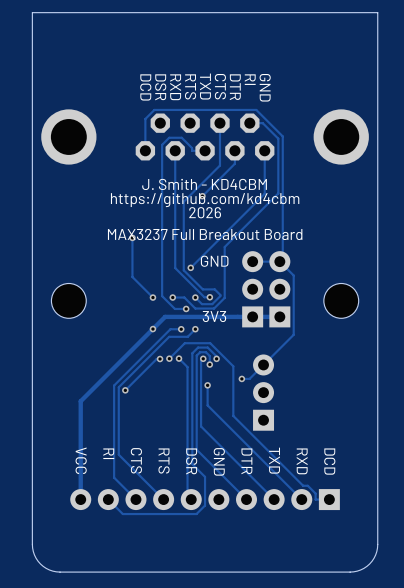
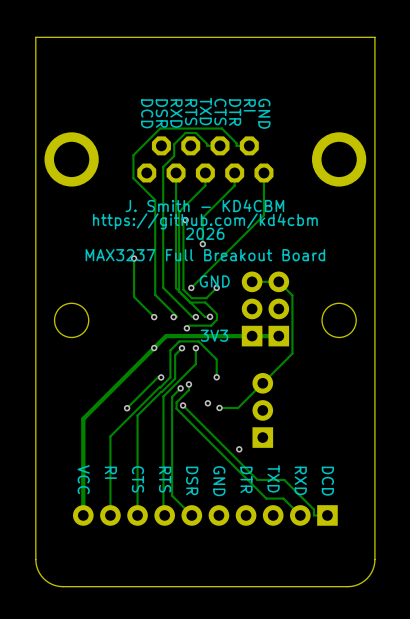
track: (219, 123) (219, 165) (183, 201) (183, 270) (202, 289) (214, 289) (220, 294) (212, 304) (202, 304) (195, 297) -> none
track: (249, 123) (262, 123) (278, 138) (278, 193) (224, 247) (224, 297) (214, 308) (195, 308) (184, 297) (172, 297) -> (249, 145) (236, 145) (236, 143) (221, 128) (160, 128) (133, 155) (133, 178) (155, 200) (155, 294) (177, 316)
track: (162, 144) (169, 137) (181, 137) (192, 148) (192, 150) (205, 150) -> (163, 167) (174, 156) (174, 144) (185, 132) (195, 132) (207, 145) (220, 145)
track: (145, 150) (145, 118) (154, 109) (256, 109) (282, 136) (282, 258) (279, 261) -> none
track: none -> (205, 172) (205, 185) (179, 211) (179, 291) (190, 302) (205, 302) (216, 314) (216, 319) (211, 325) (188, 325)
track: none -> (202, 217) (202, 244)
via: (202, 196) -> none
track: none -> (185, 220) (183, 222) (183, 289) (191, 298) (206, 298) (216, 287)
via: none -> (185, 220)
via: none -> (202, 244)
track: (162, 267) (162, 296) (174, 308) (186, 308) -> (163, 287) (192, 316) (195, 316)
via: none -> (216, 287)
track: (181, 329) (170, 329) (114, 385) (114, 477) (135, 499) -> (181, 348) (175, 355) (175, 378) (137, 415) (137, 515)
track: (195, 329) (187, 336) (169, 336) (118, 387) (118, 454) (162, 498) -> (195, 348) (195, 364) (163, 396) (163, 514)
track: (216, 356) (207, 347) (198, 347) (192, 353) (192, 464) (205, 476) (205, 505) (196, 514) (122, 514) (108, 499) -> (216, 374) (216, 359) (198, 341) (179, 341) (170, 350) (170, 377) (110, 436) (110, 515)
track: (169, 358) (184, 343) (210, 343) (233, 366) (233, 415) (303, 485) (307, 485) -> (183, 405) (257, 479) (284, 479) (306, 501)
via: (169, 358) -> none
track: (179, 358) (187, 367) (187, 495) -> (180, 388) (172, 396) (172, 495) (188, 511)
via: (179, 358) -> none
track: (203, 358) (201, 360) (201, 426) (274, 499) -> none
via: (203, 358) -> none
track: (209, 364) (209, 356) (205, 352) (200, 352) (196, 355) (196, 449) (246, 499) -> none
via: (209, 364) -> none
via: none -> (188, 384)
via: none -> (180, 388)
via: (241, 378) -> none
track: (249, 378) (241, 378) -> (249, 397) (238, 407) (219, 407)
track: (207, 385) (207, 405) (284, 482) -> (188, 384) (188, 390) (176, 402) (176, 408) (266, 498) (283, 498)
via: none -> (183, 405)
via: none -> (219, 407)
via: none -> (239, 449)

